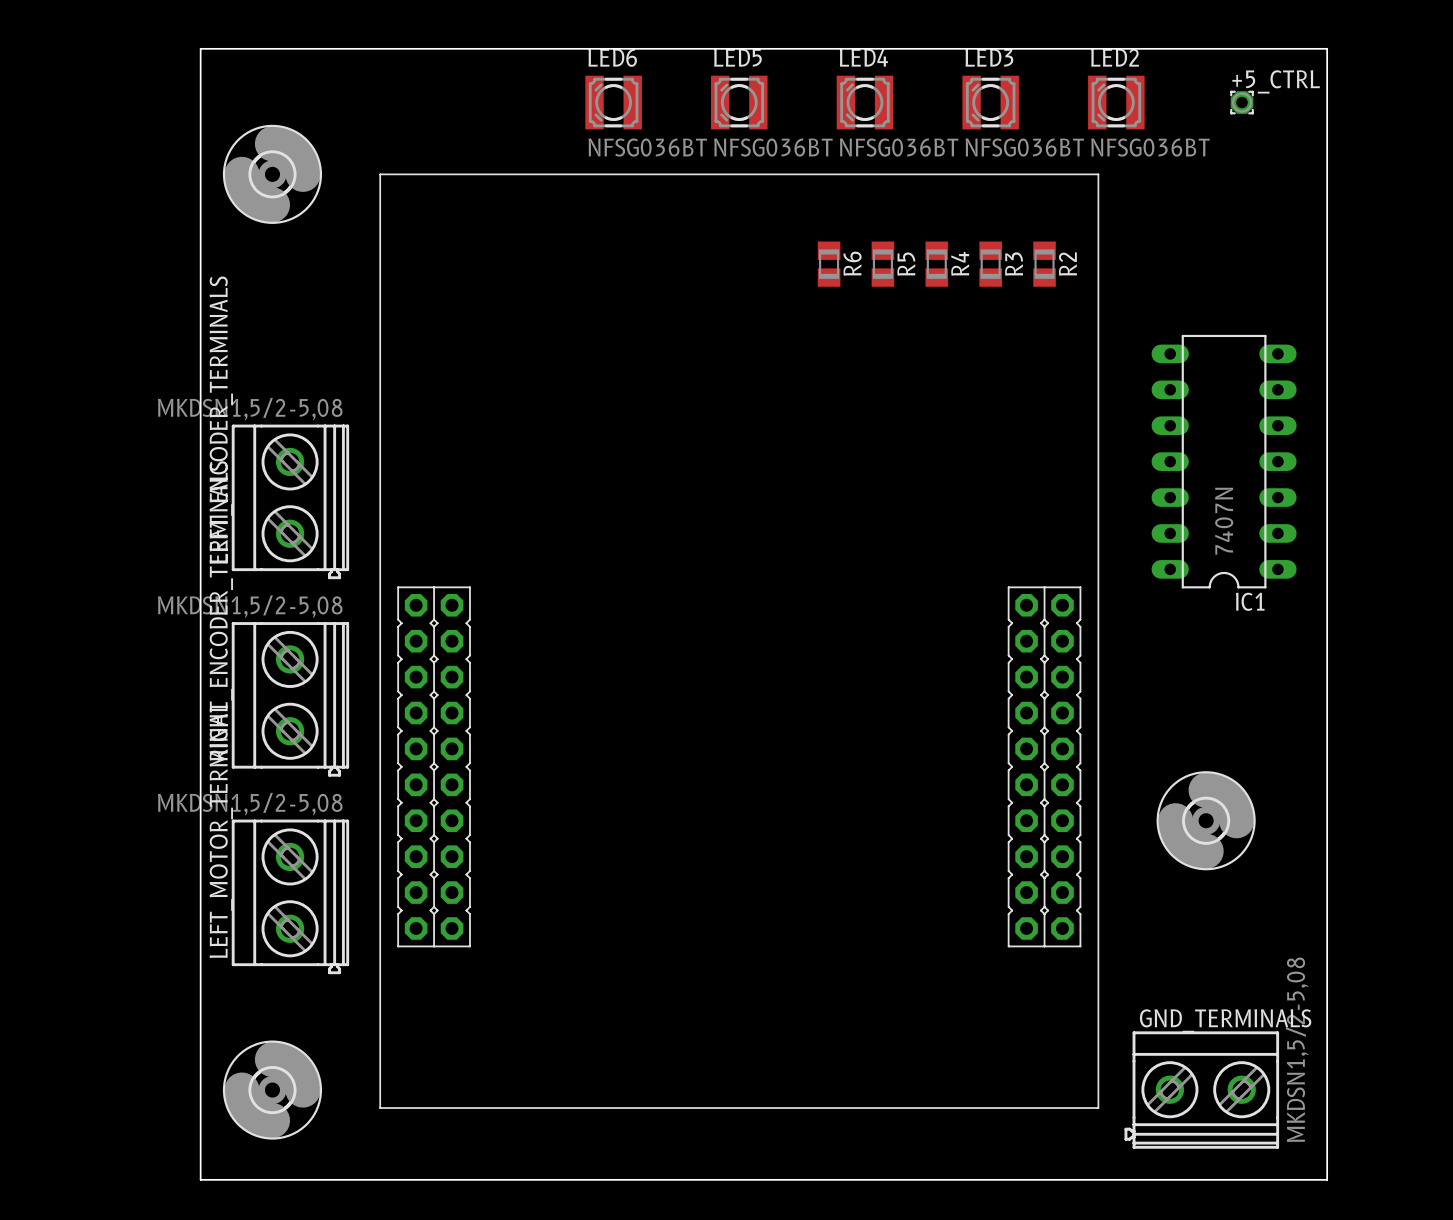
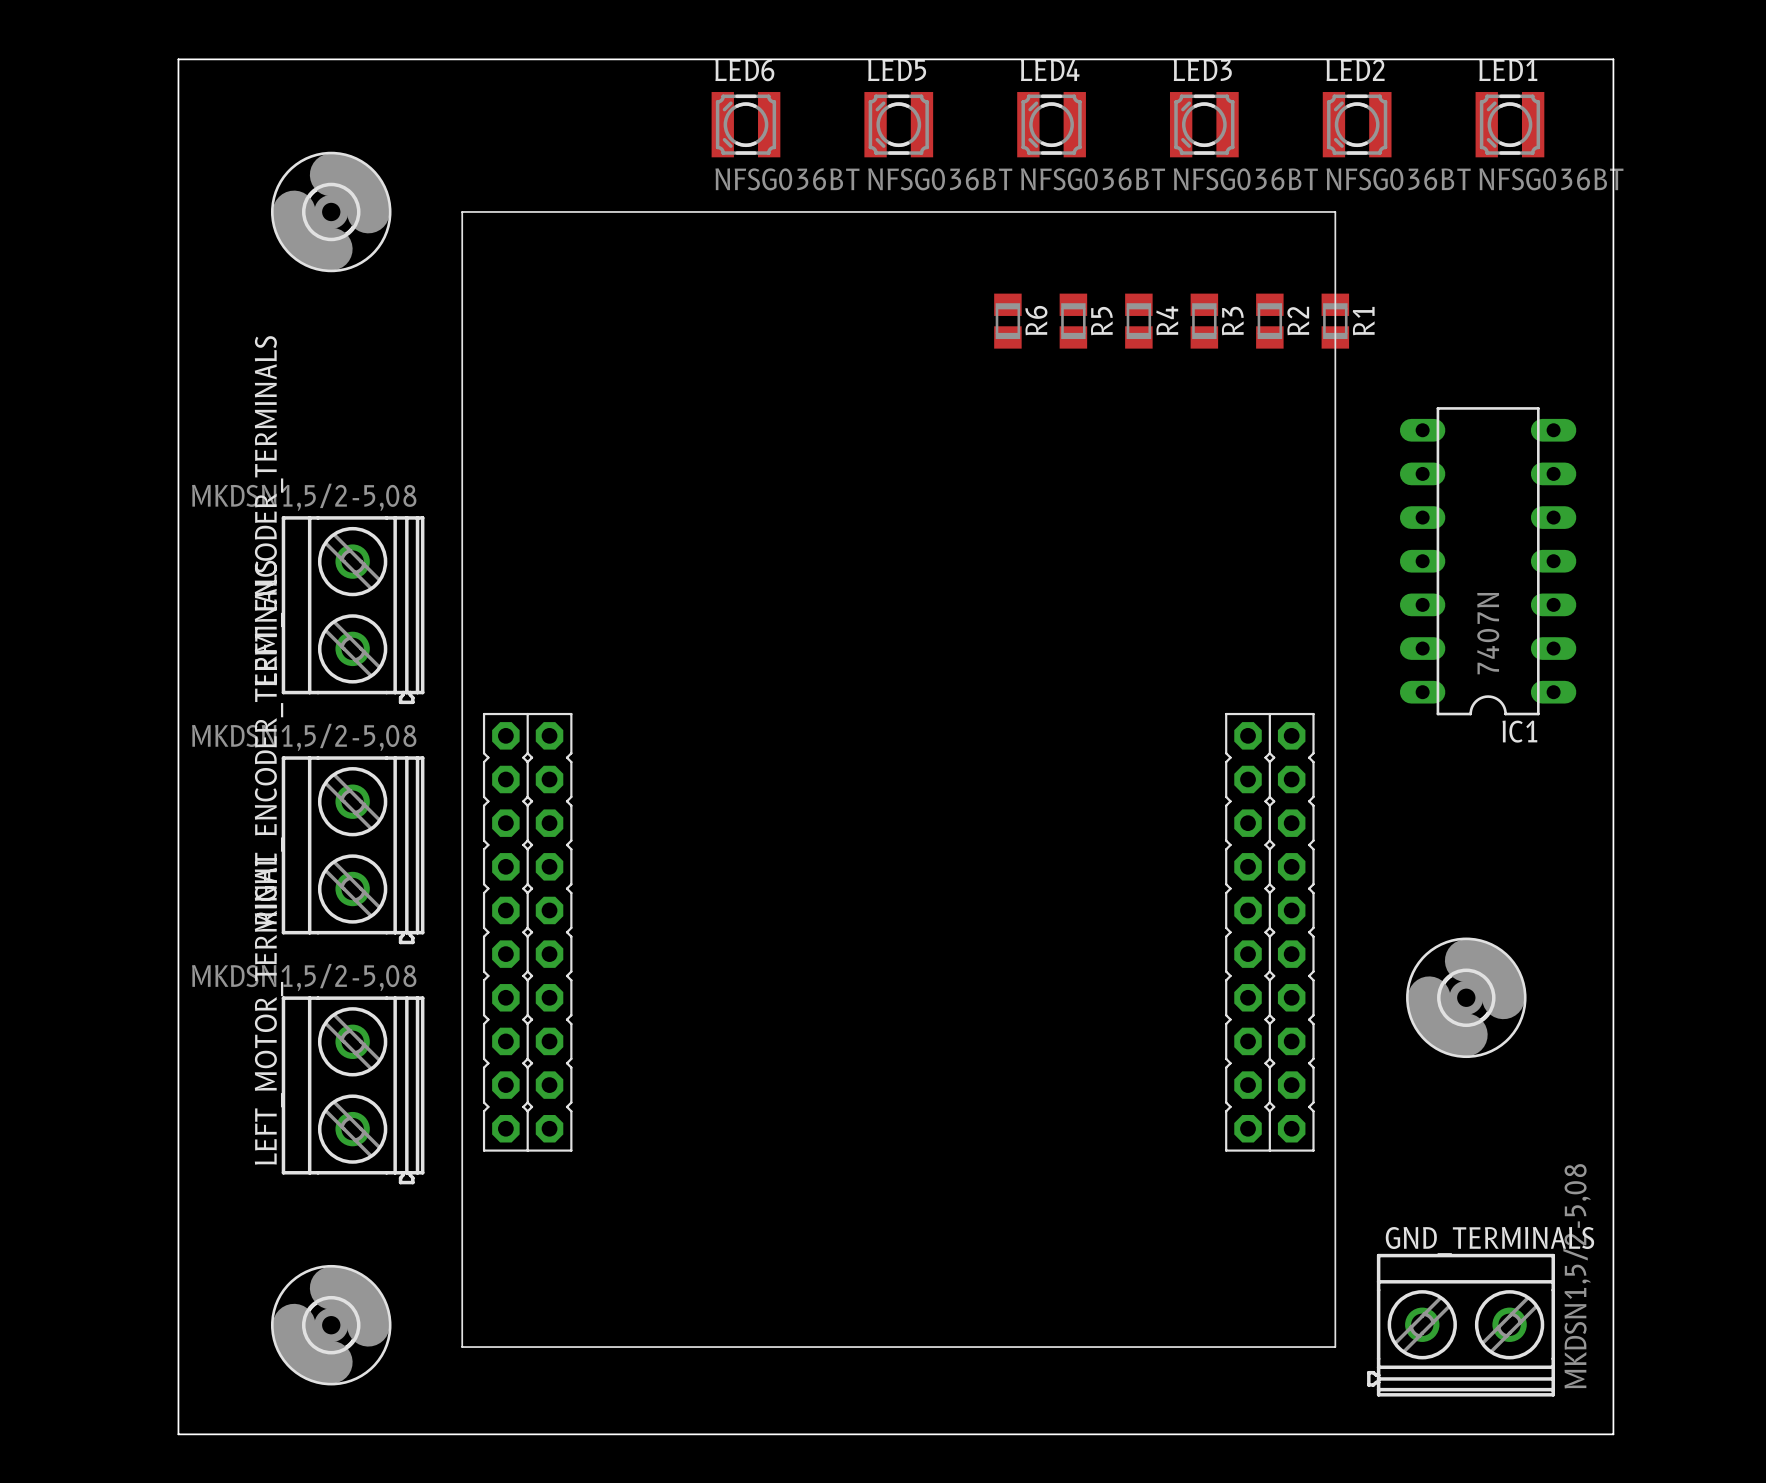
board edge: (200, 48) (200, 1179) -> (243, 59) (178, 59) (178, 1434) (243, 1434)
+5_CTRL: (1242, 102) -> none
LED1: none -> NFSG036BT (1509, 124)
R1: none -> (1335, 321)

